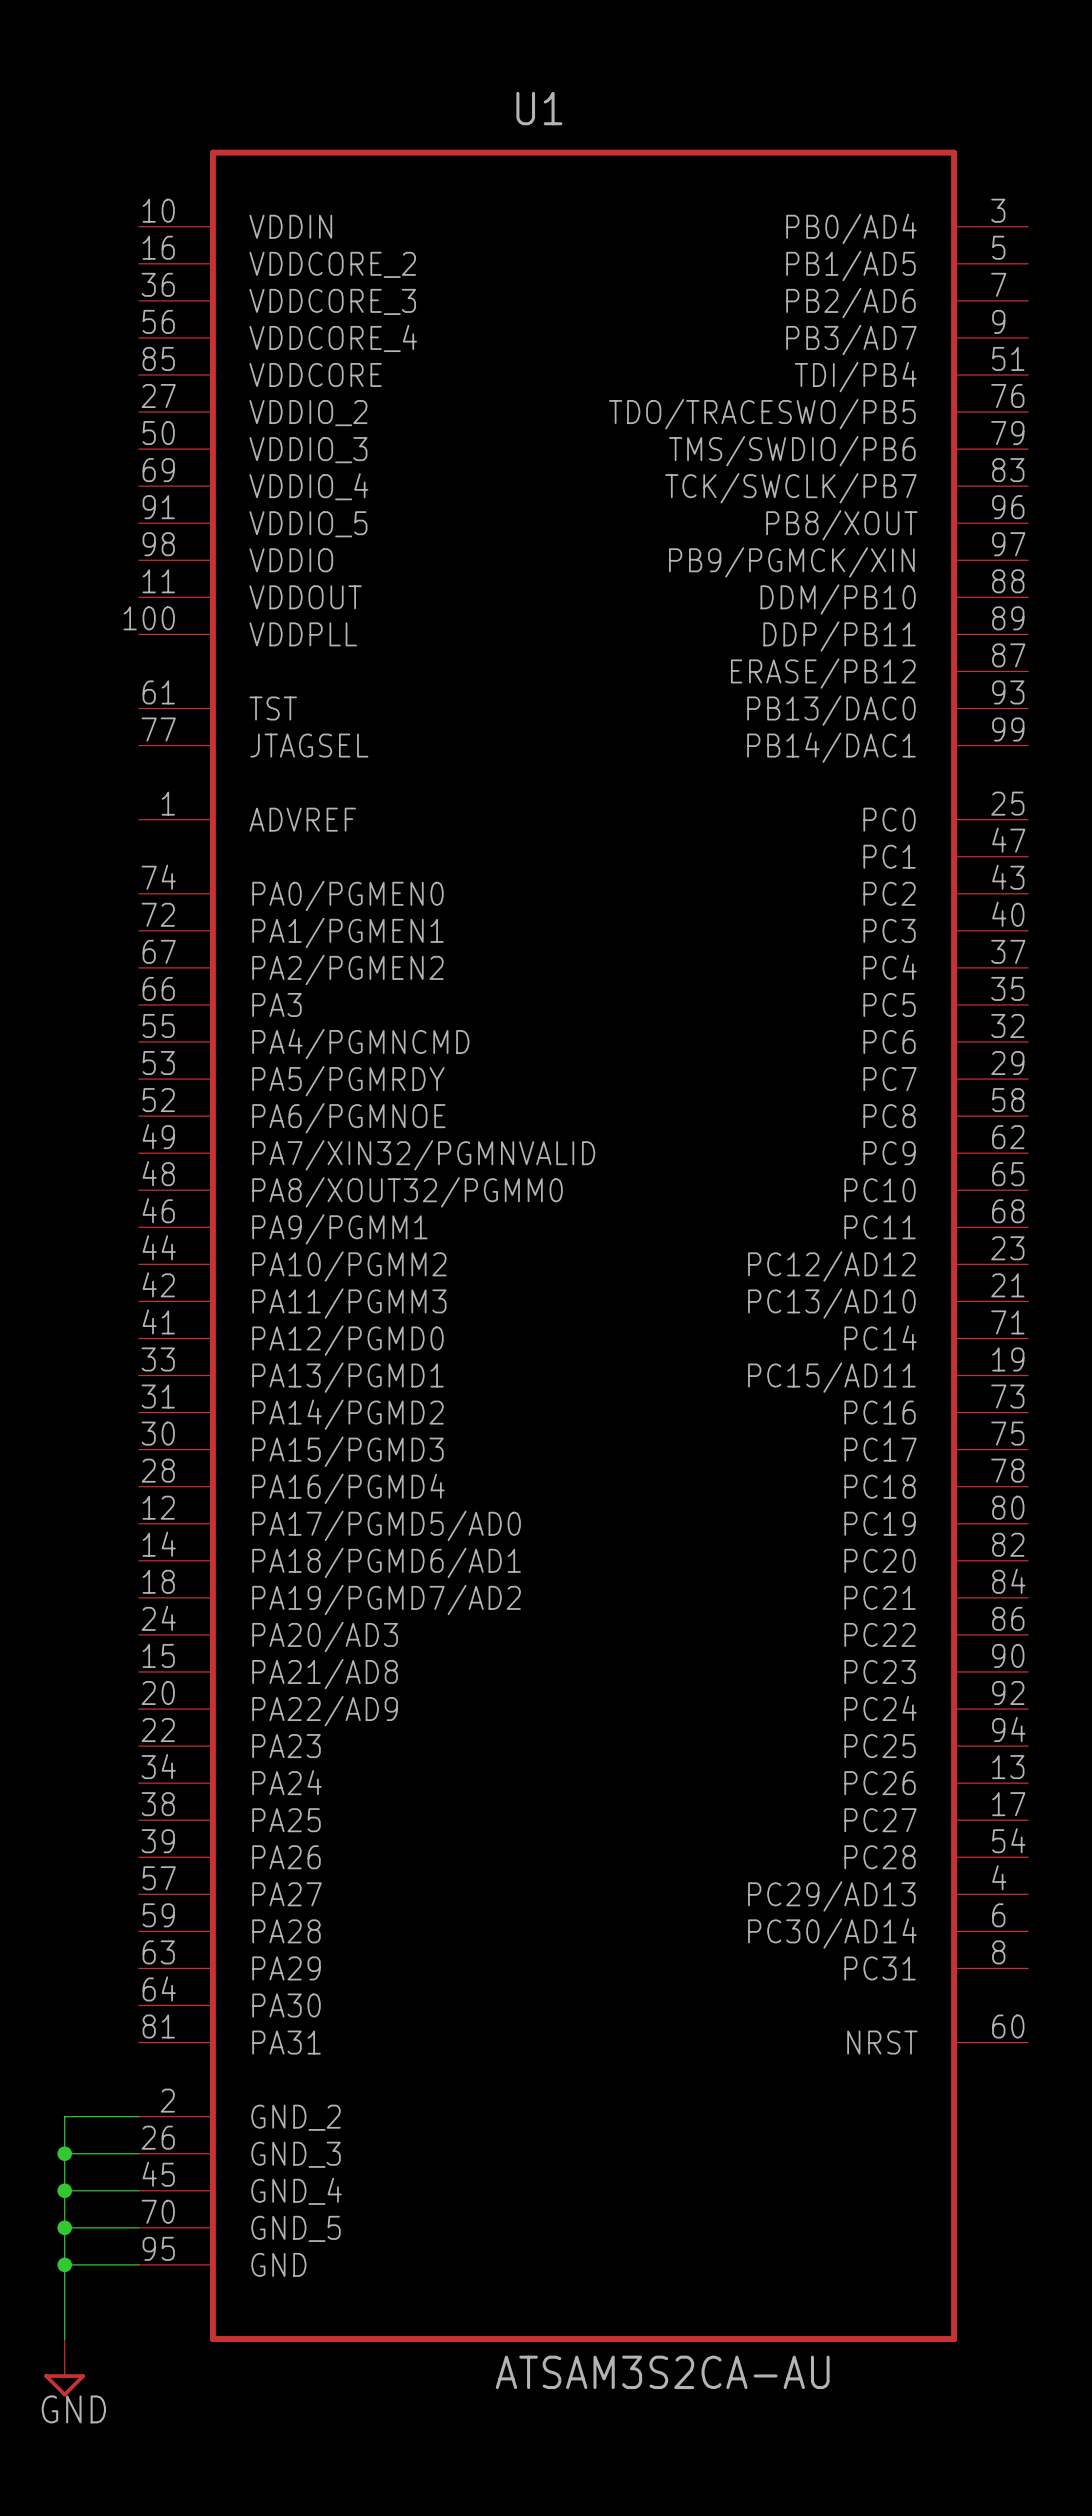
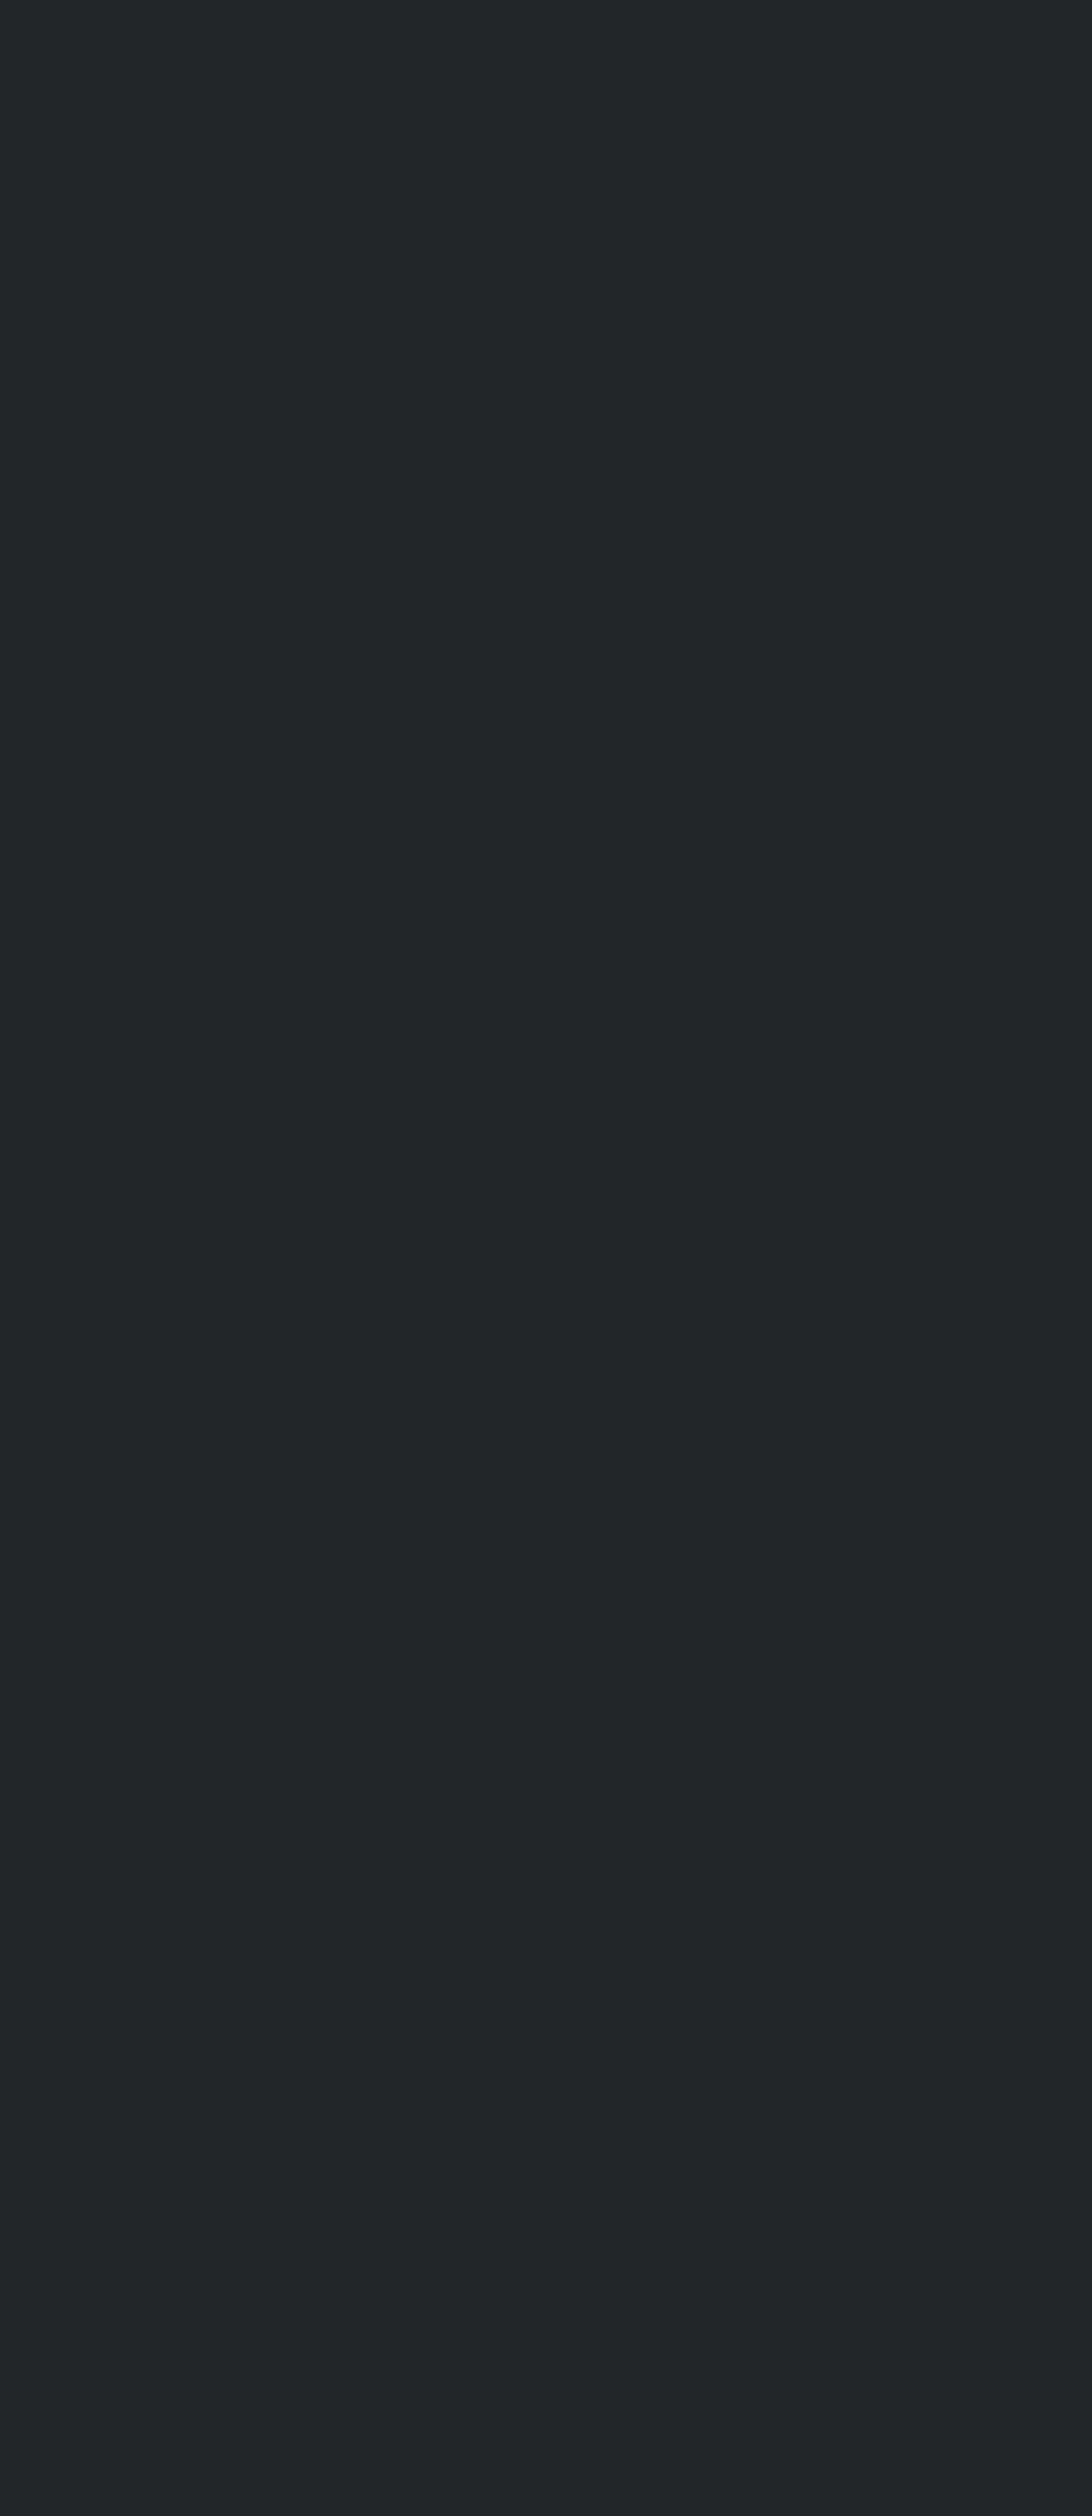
U1: ATSAM3S2CA-AU (583, 1245) -> none
wire: (138, 2116) (64, 2116) (64, 2339) -> none
wire: (64, 2153) (138, 2153) -> none
junction: (64, 2153) -> none
wire: (64, 2190) (138, 2190) -> none
junction: (64, 2190) -> none
wire: (64, 2227) (138, 2227) -> none
junction: (64, 2227) -> none
wire: (64, 2264) (138, 2264) -> none
junction: (64, 2264) -> none
power symbol: GND (64, 2367) -> none

